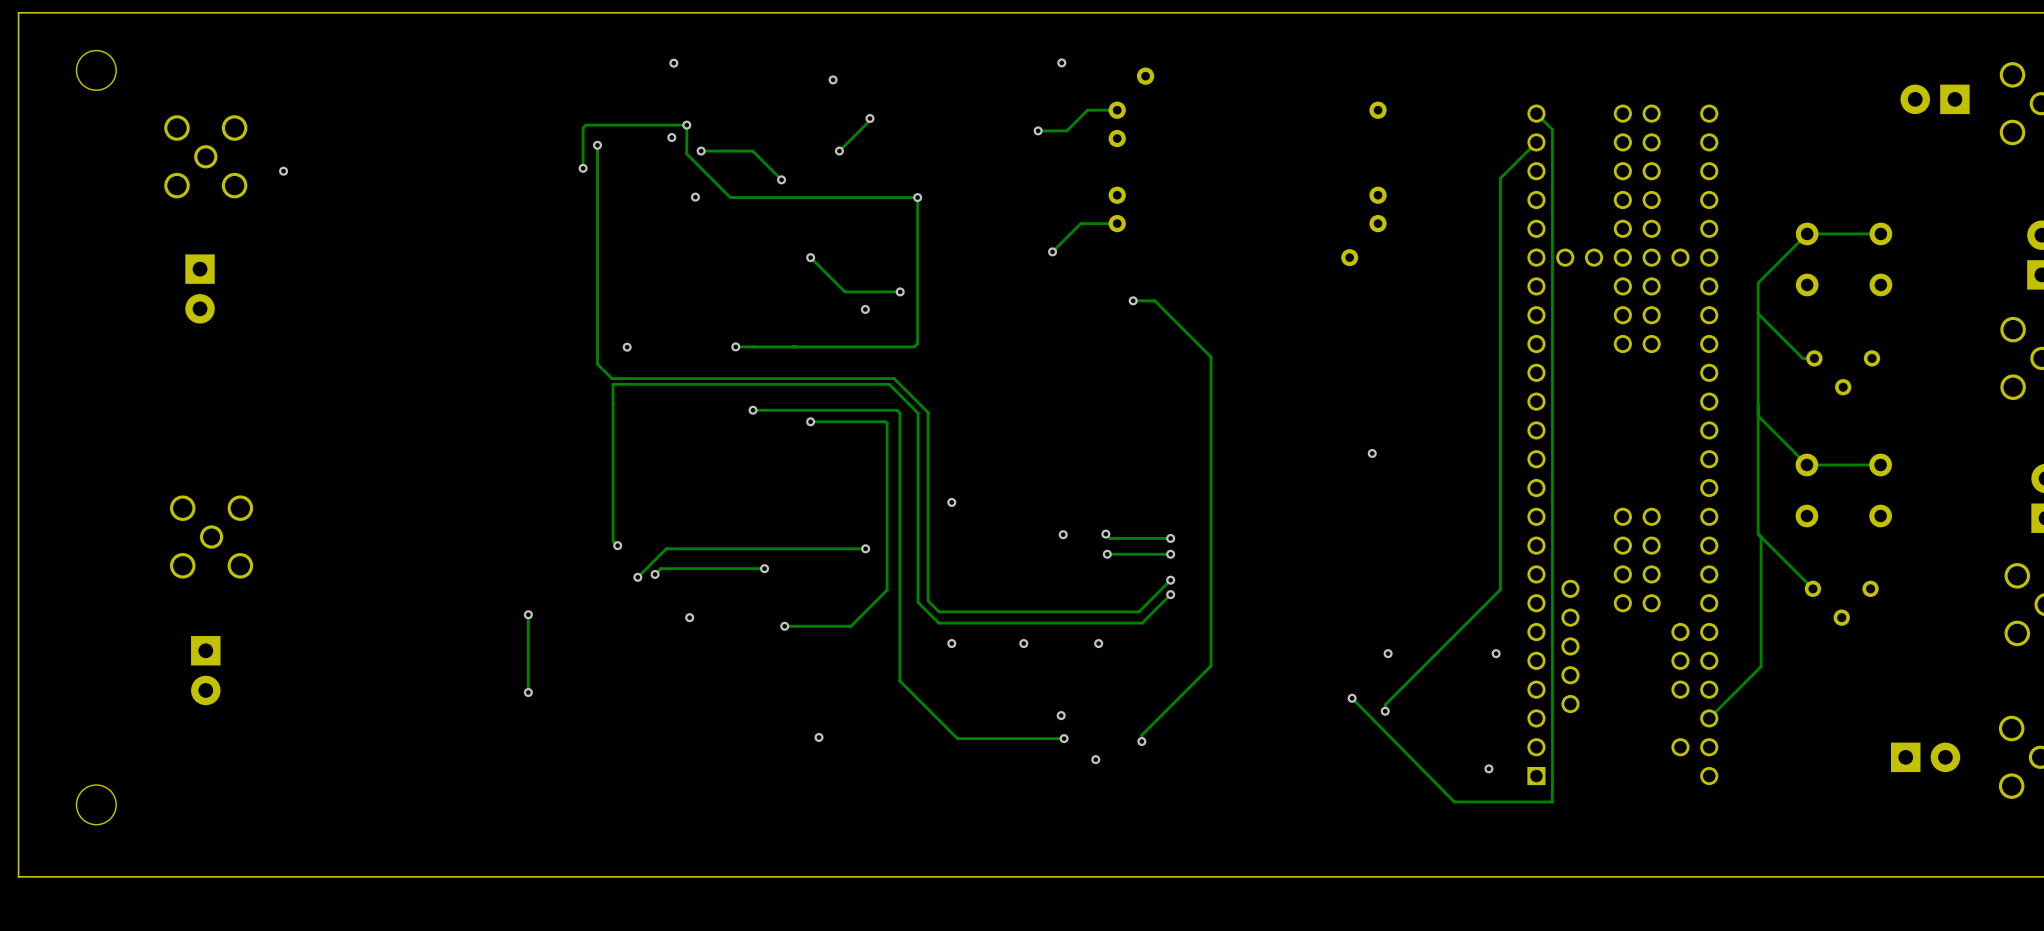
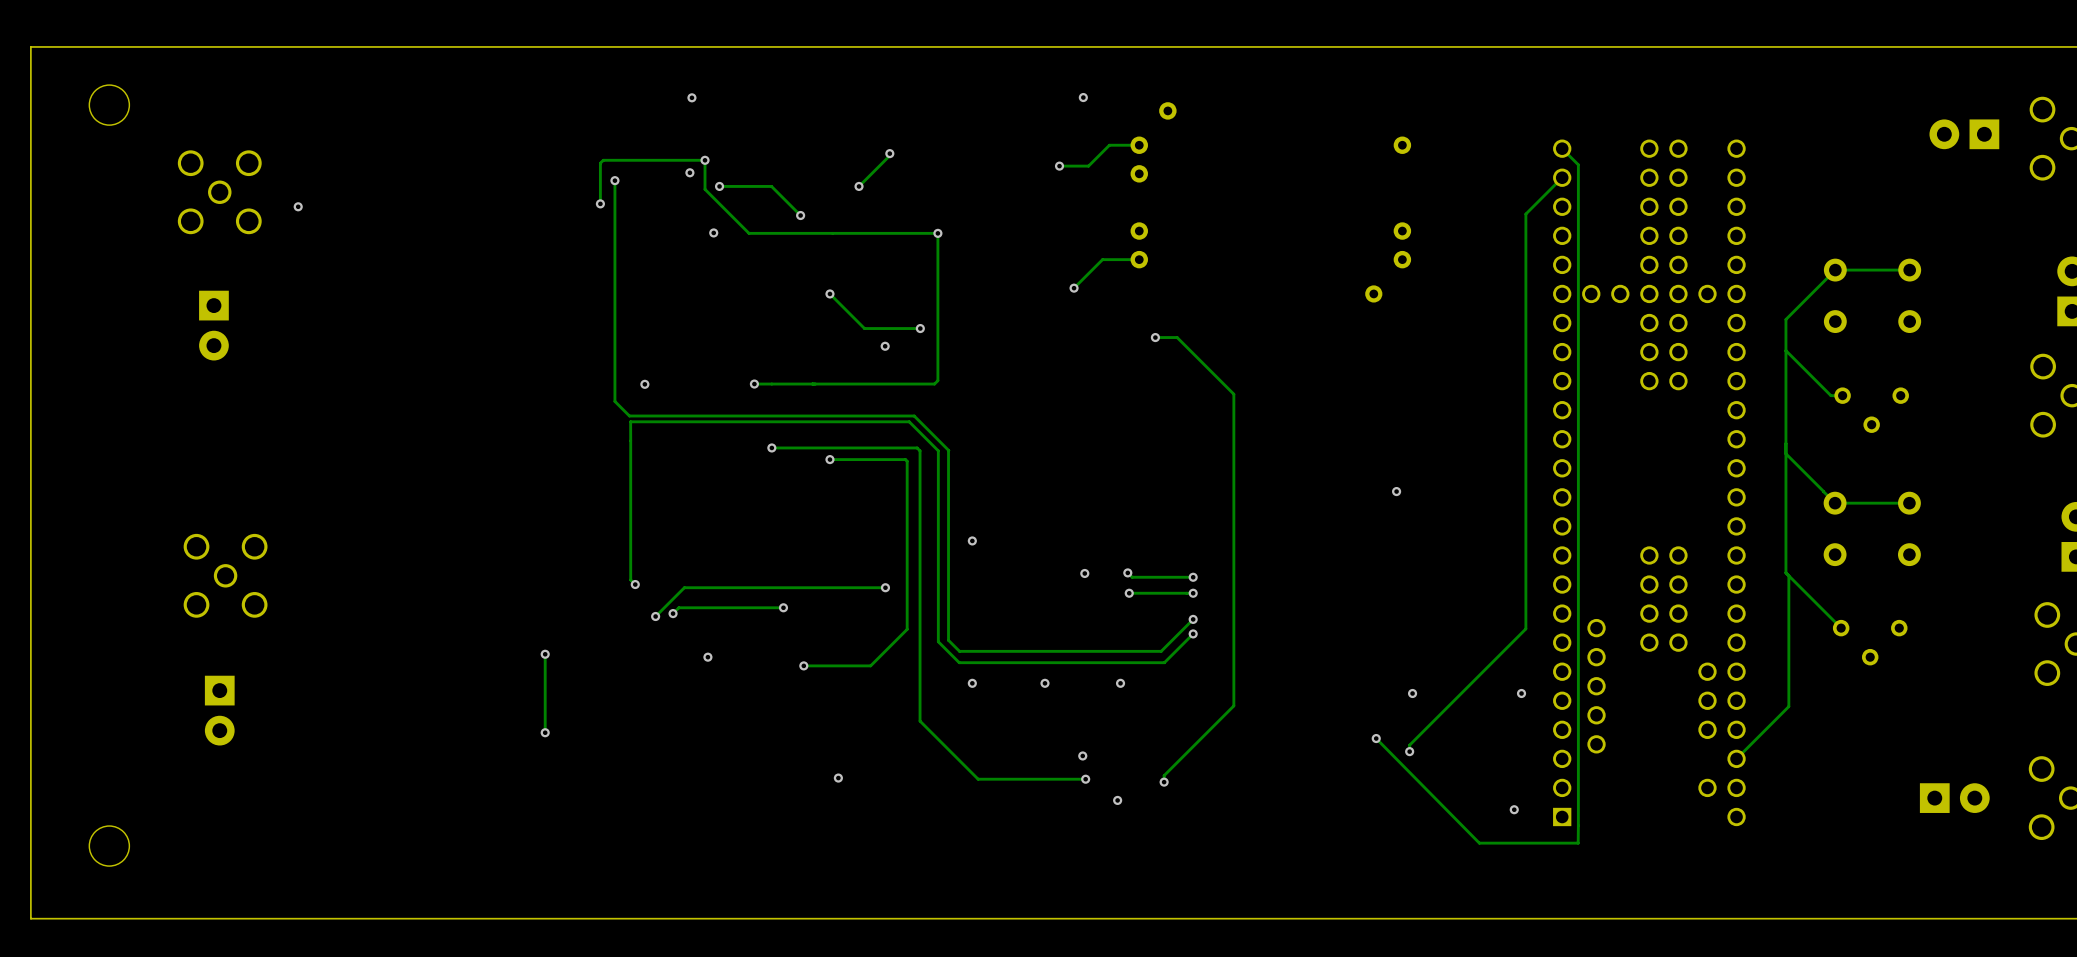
via: (833, 79) -> none

